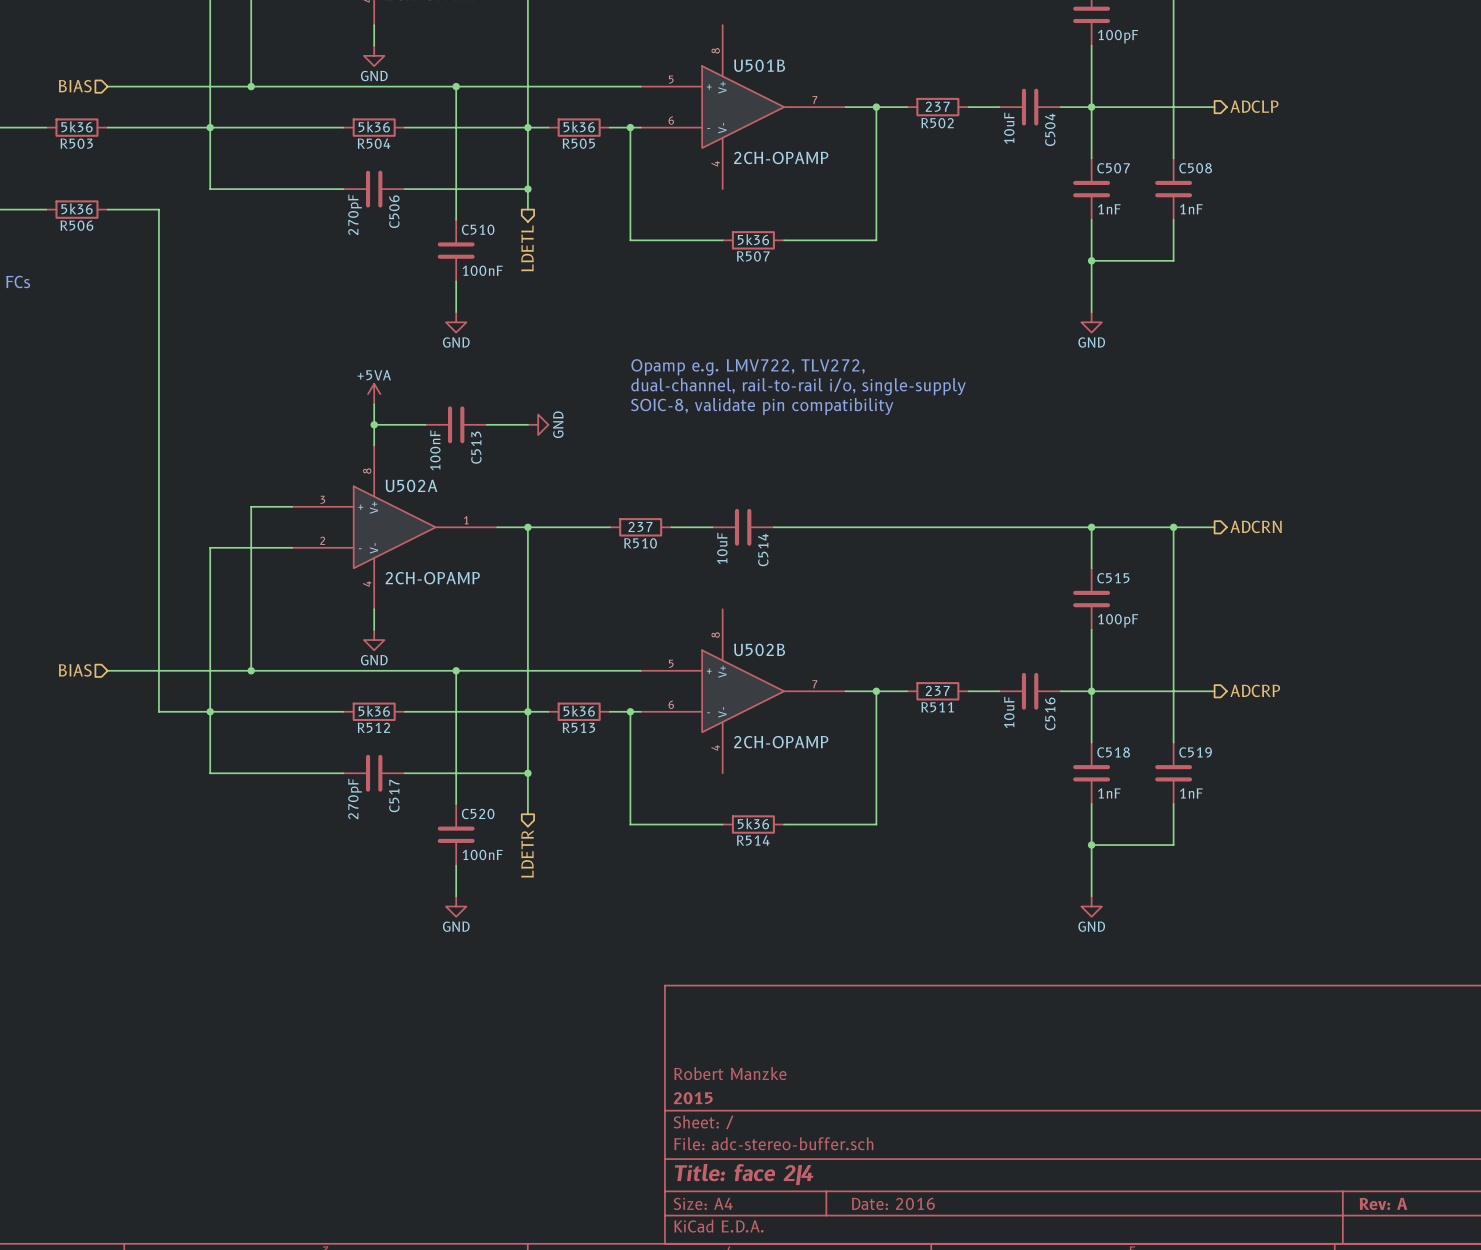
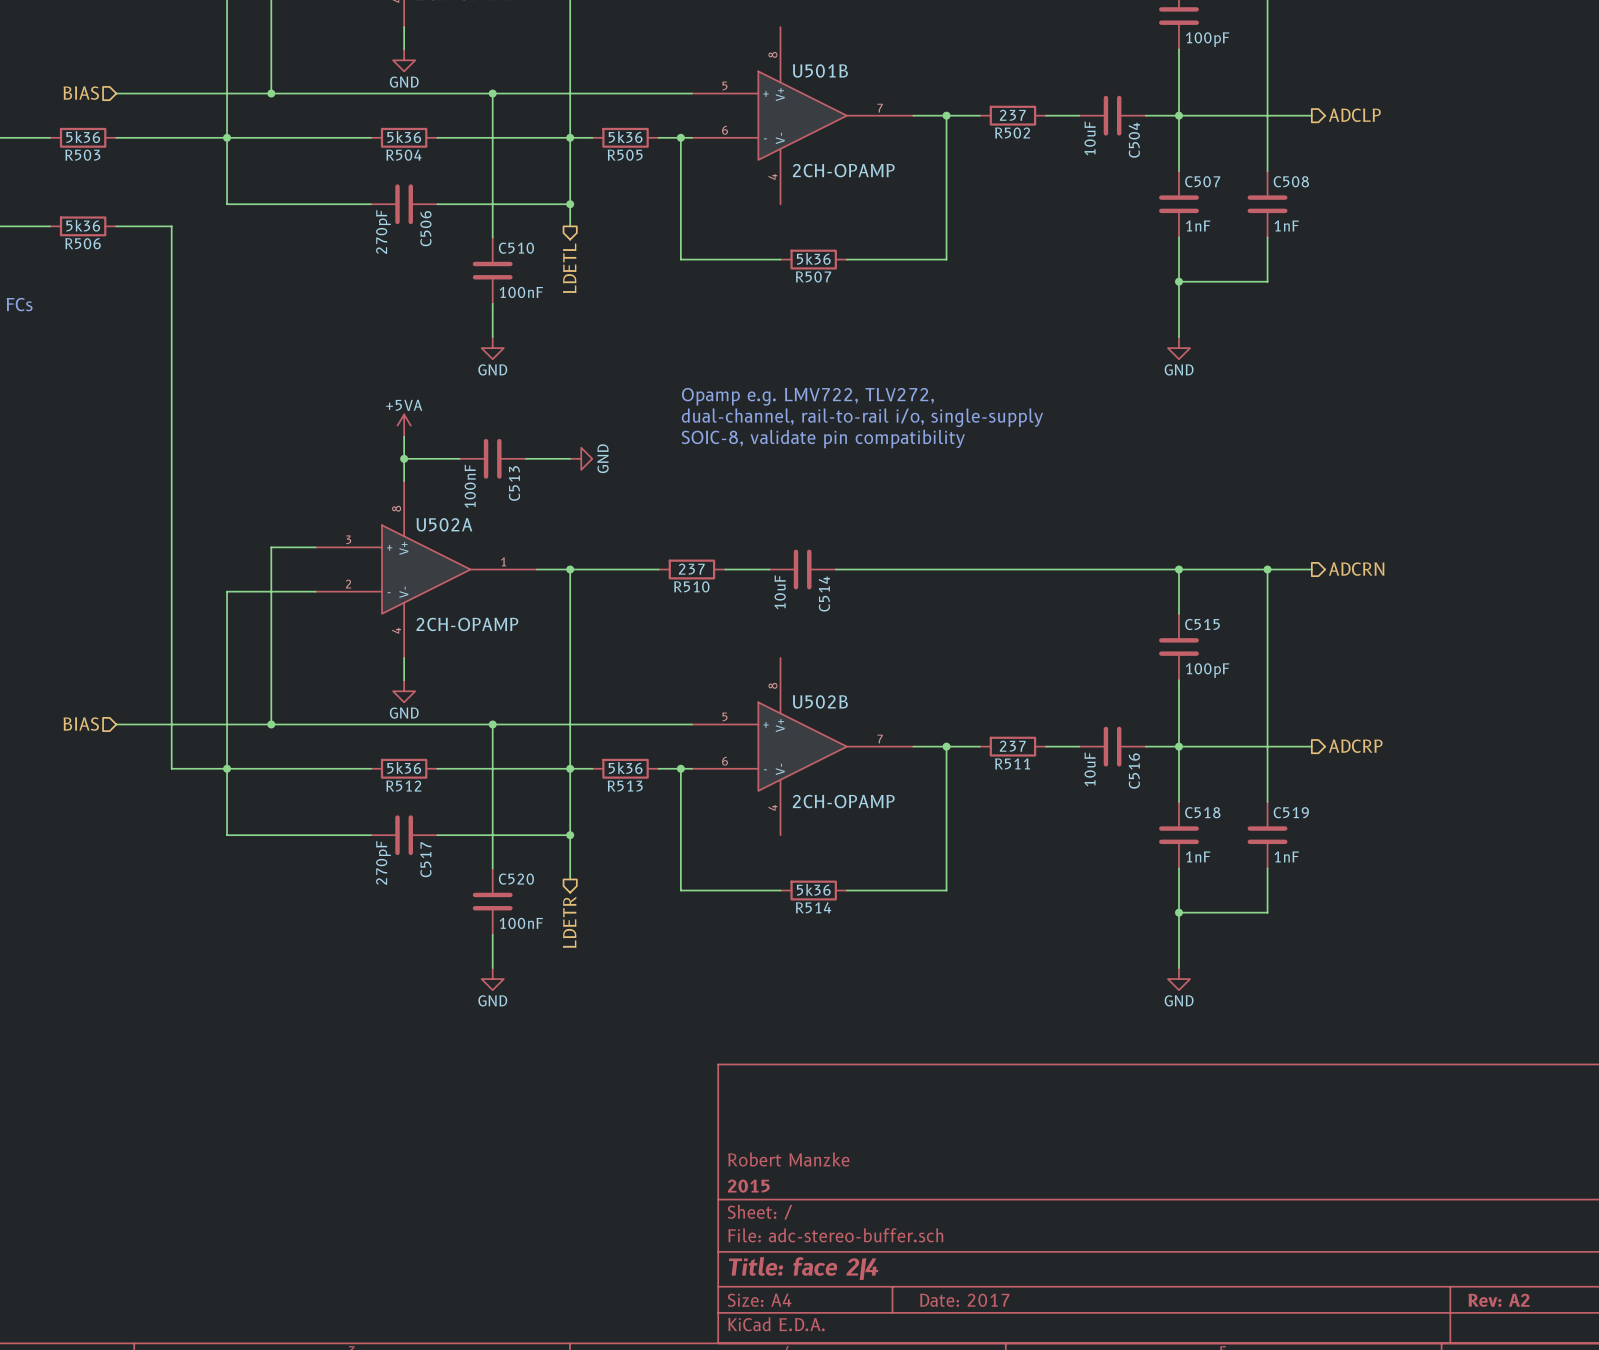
title block: Date: 2016 (893, 1203) -> Date: 2017 (964, 1300)
title block: Rev: A (1383, 1203) -> Rev: A2 (1499, 1300)

